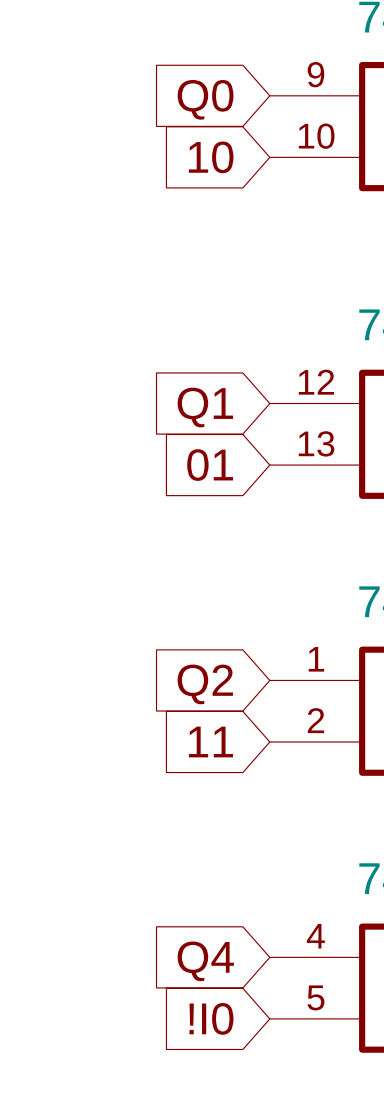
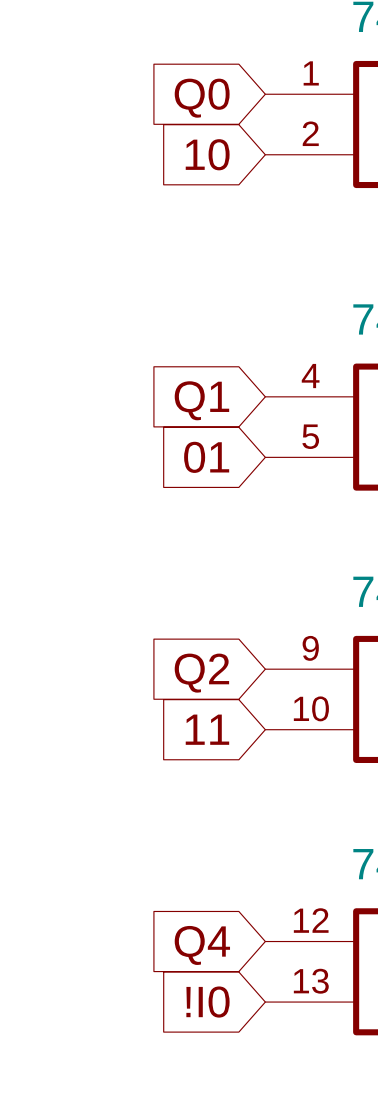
part pin number: 9 (315, 74) -> 1 (311, 73)
part pin number: 10 (316, 136) -> 2 (310, 133)
part pin number: 12 (316, 382) -> 4 (310, 376)
part pin number: 13 (316, 443) -> 5 (310, 436)
part pin number: 1 (316, 659) -> 9 (310, 648)
part pin number: 2 (315, 720) -> 10 (311, 708)
part pin number: 4 (315, 936) -> 12 (311, 920)
part pin number: 5 (315, 997) -> 13 (311, 981)

